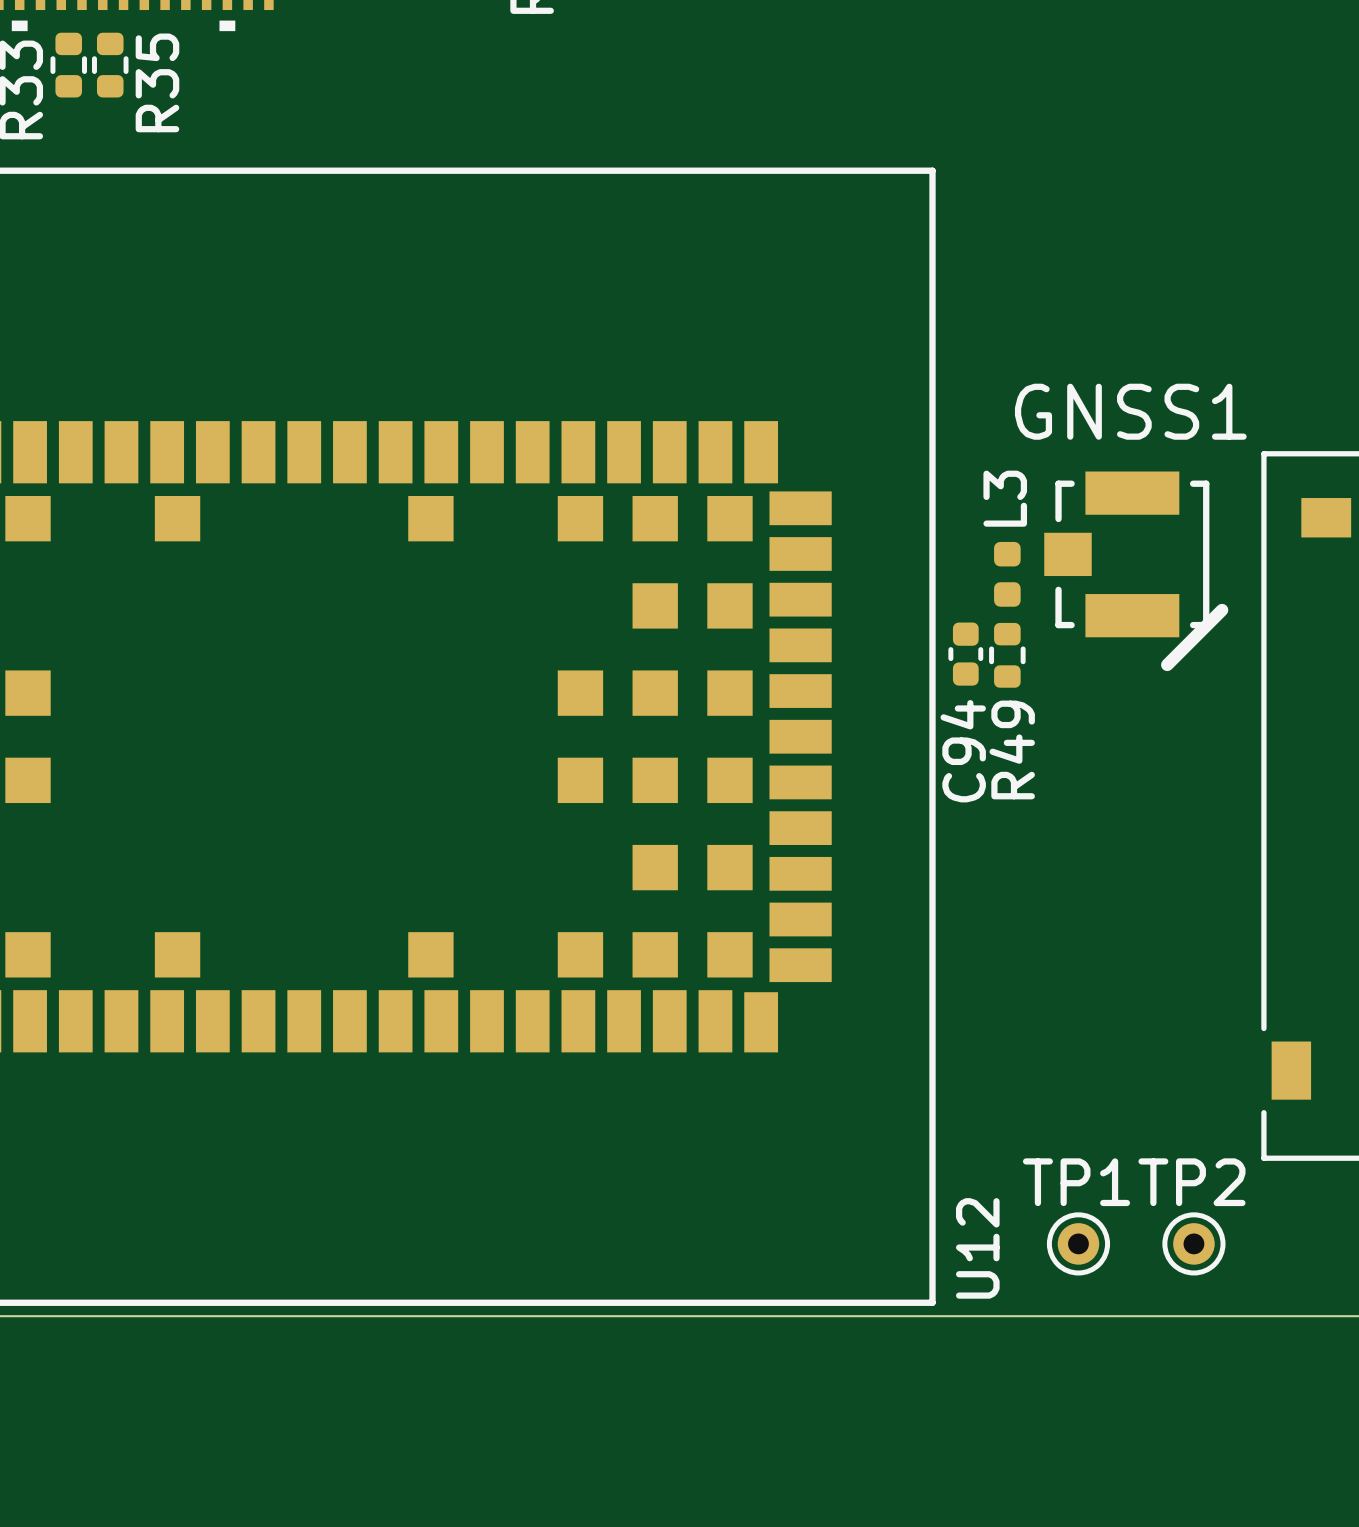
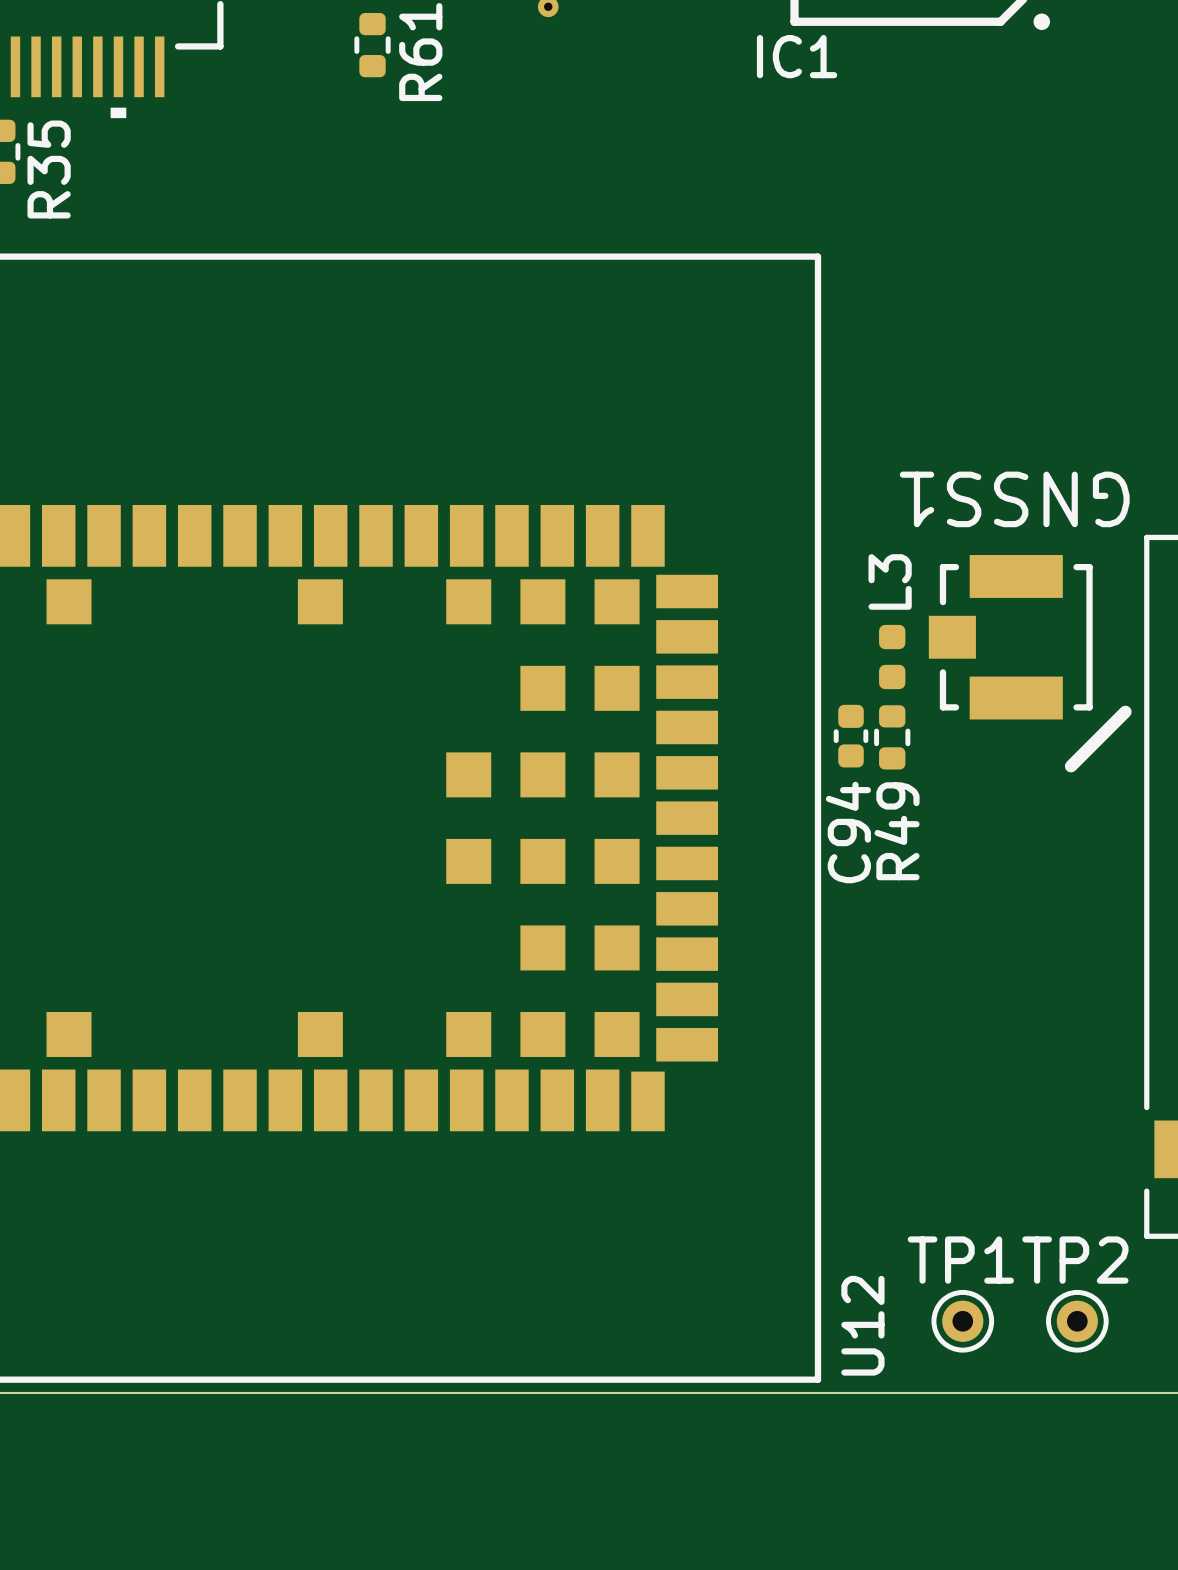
GNSS1 name rotation: 0° (1130, 411) -> 180° (1014, 499)
GNSS1 footprint: [1044, 471, 1229, 672] -> [928, 555, 1132, 773]

